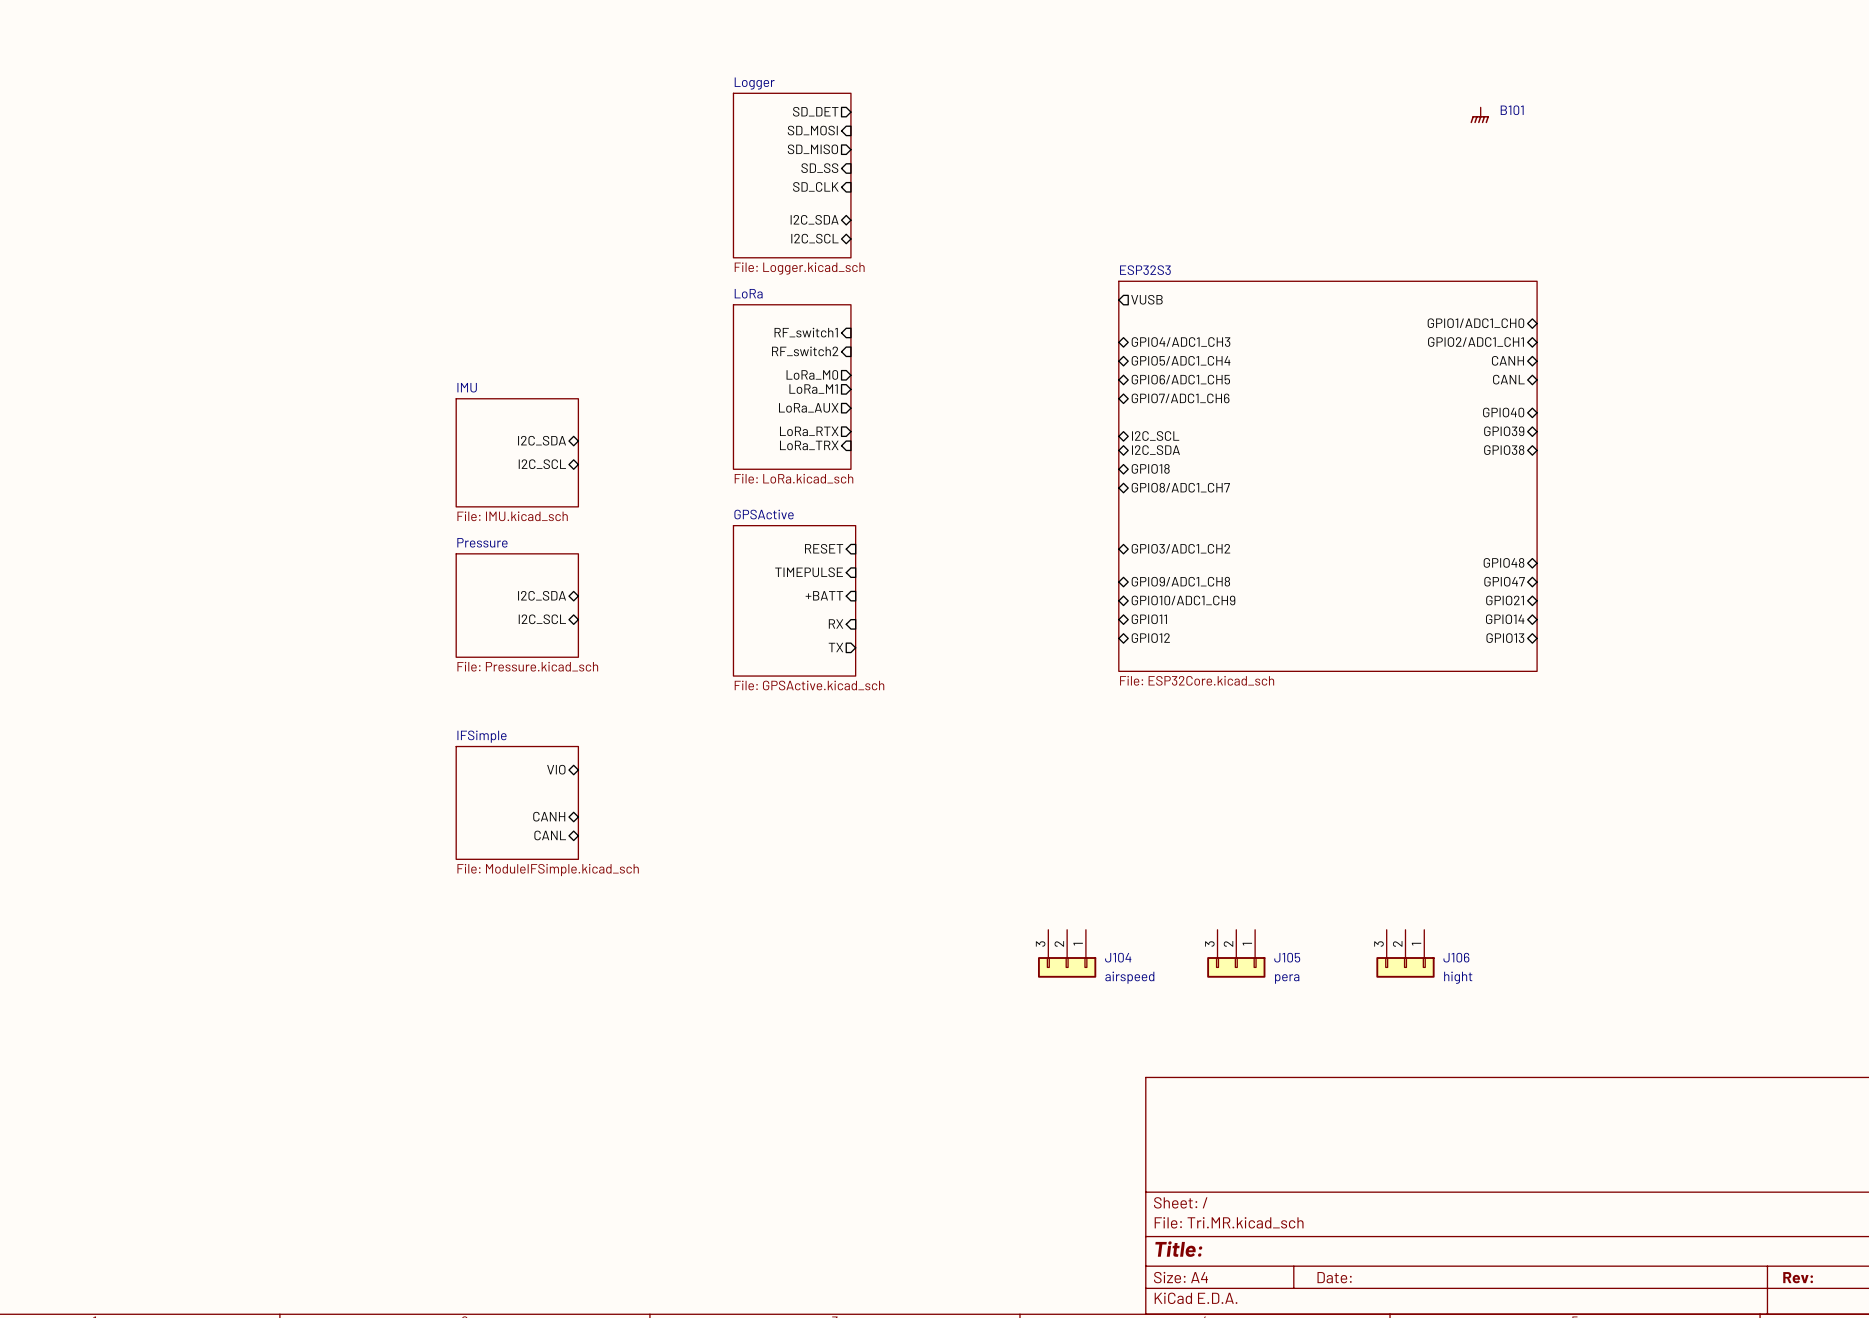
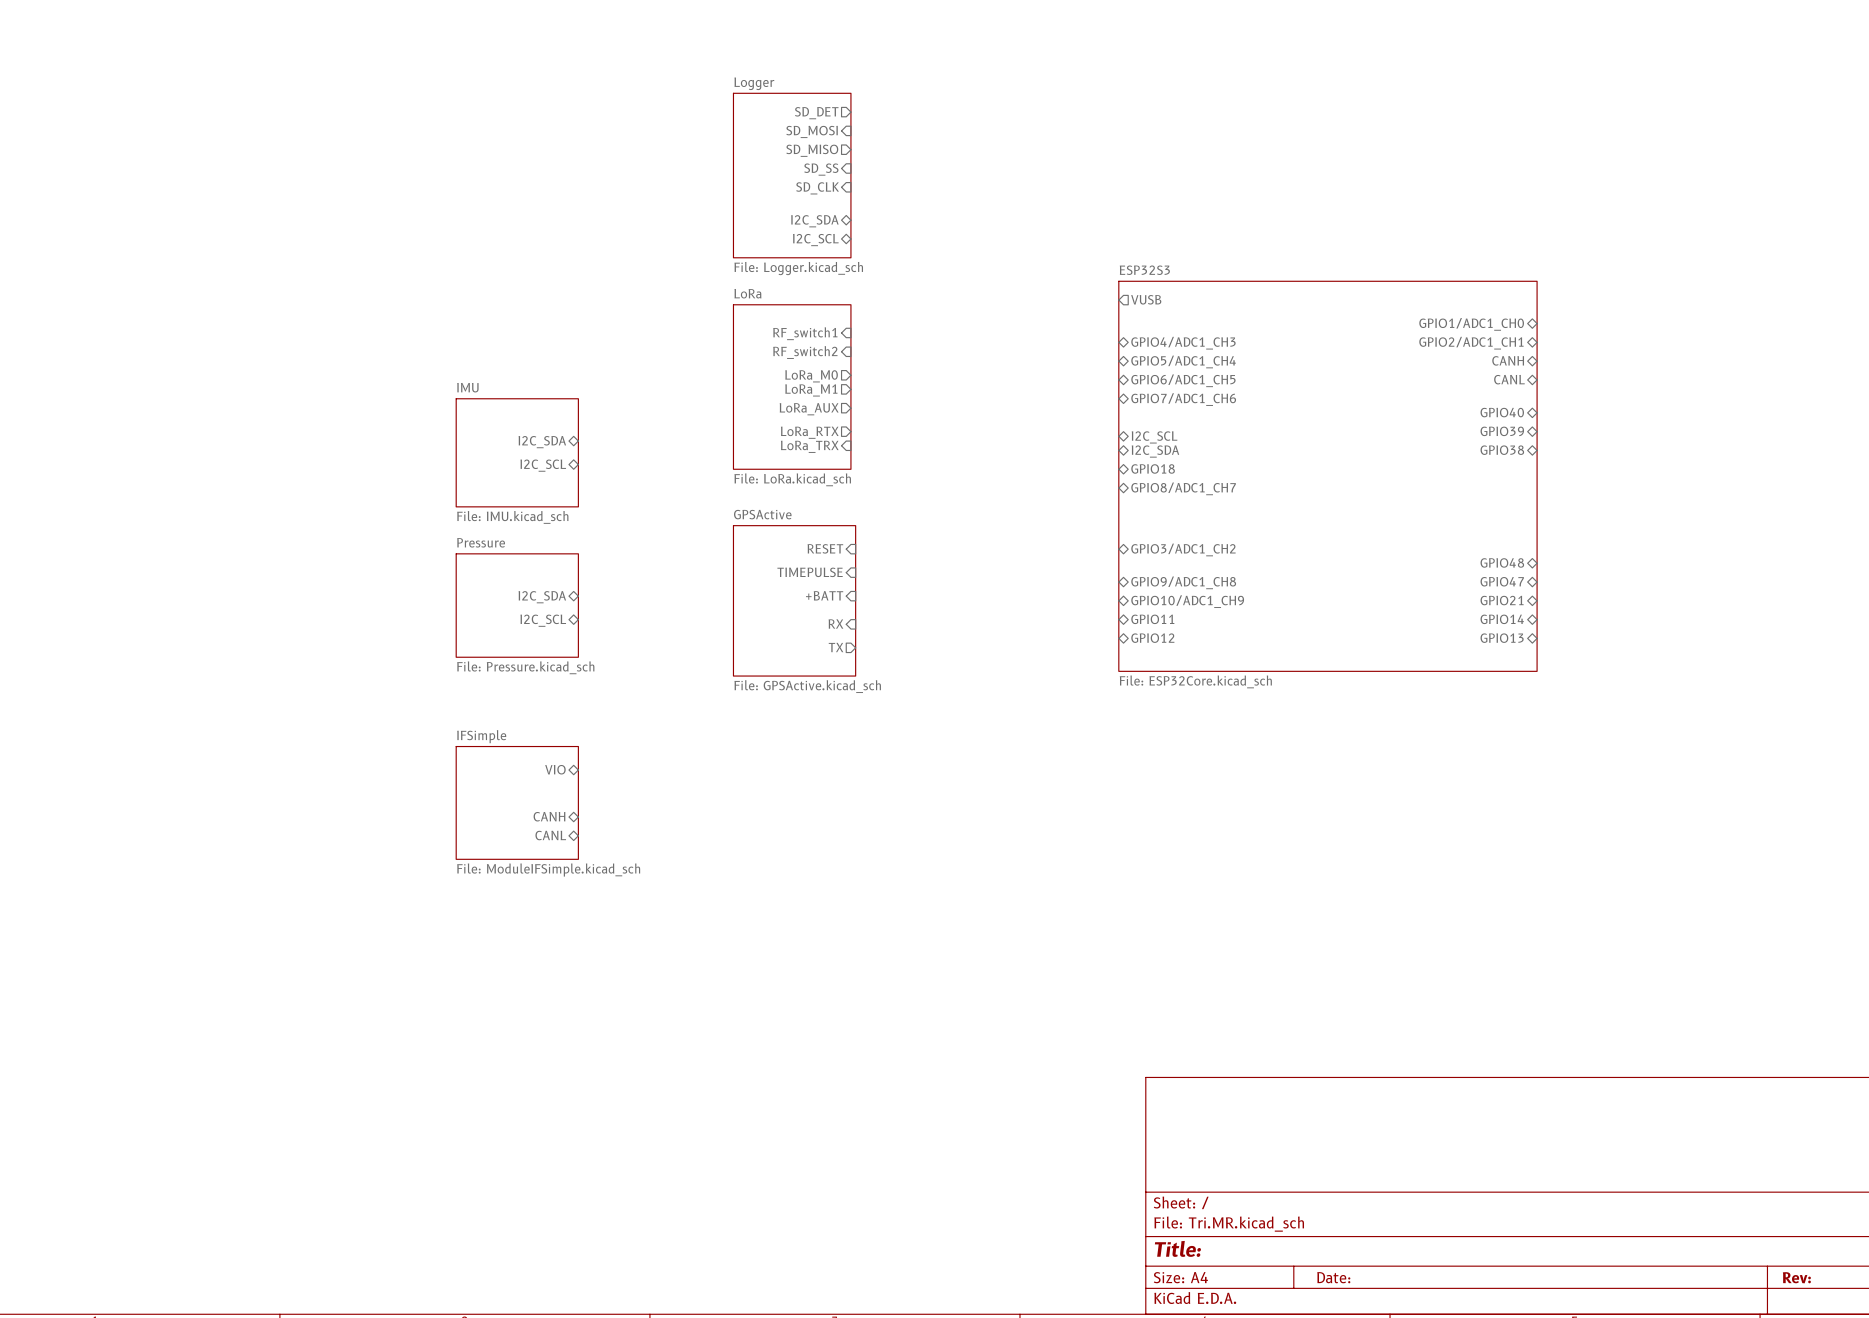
B101: (1479, 115) -> none
J104: airspeed (1067, 953) -> none
J105: pera (1236, 953) -> none
J106: hight (1405, 953) -> none

